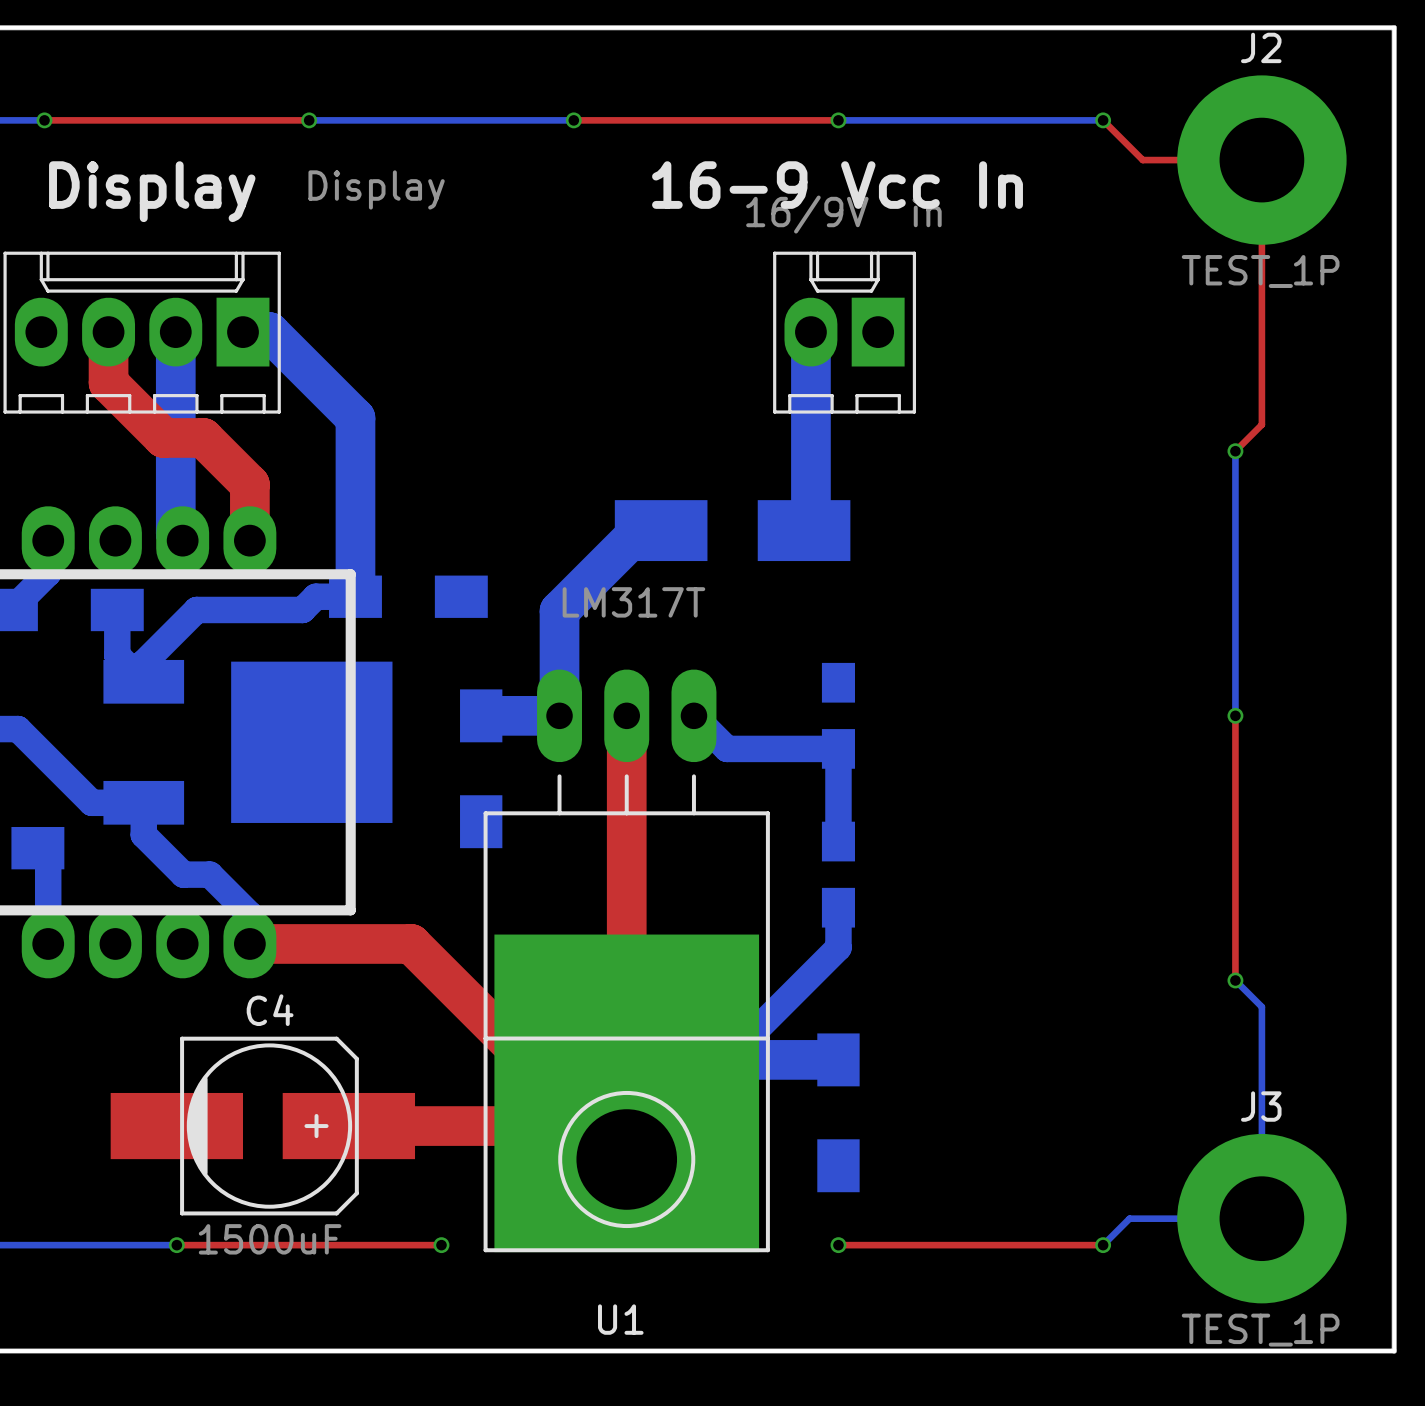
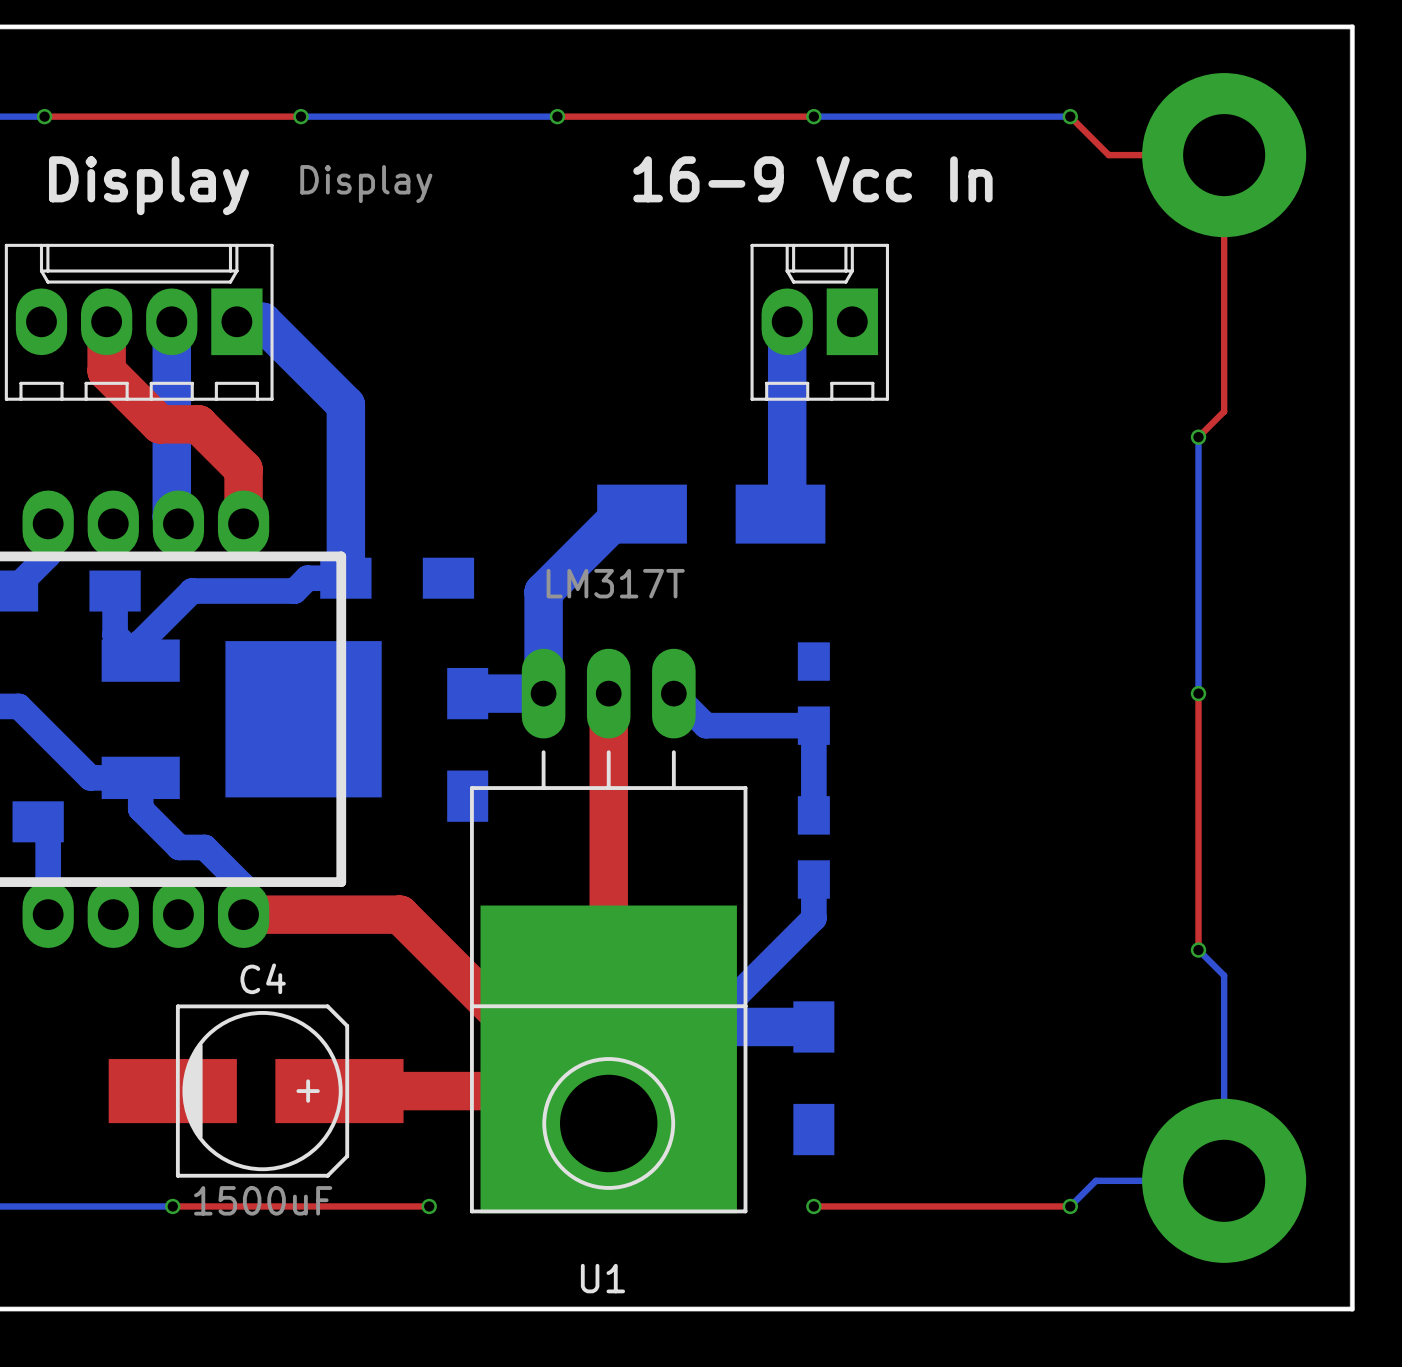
J2 name: J2 (1261, 47) -> none
part value: 16/9V in (843, 214) -> none
J2 value: TEST_1P (1260, 271) -> none
J3 name: J3 (1261, 1106) -> none
J3 value: TEST_1P (1260, 1330) -> none

